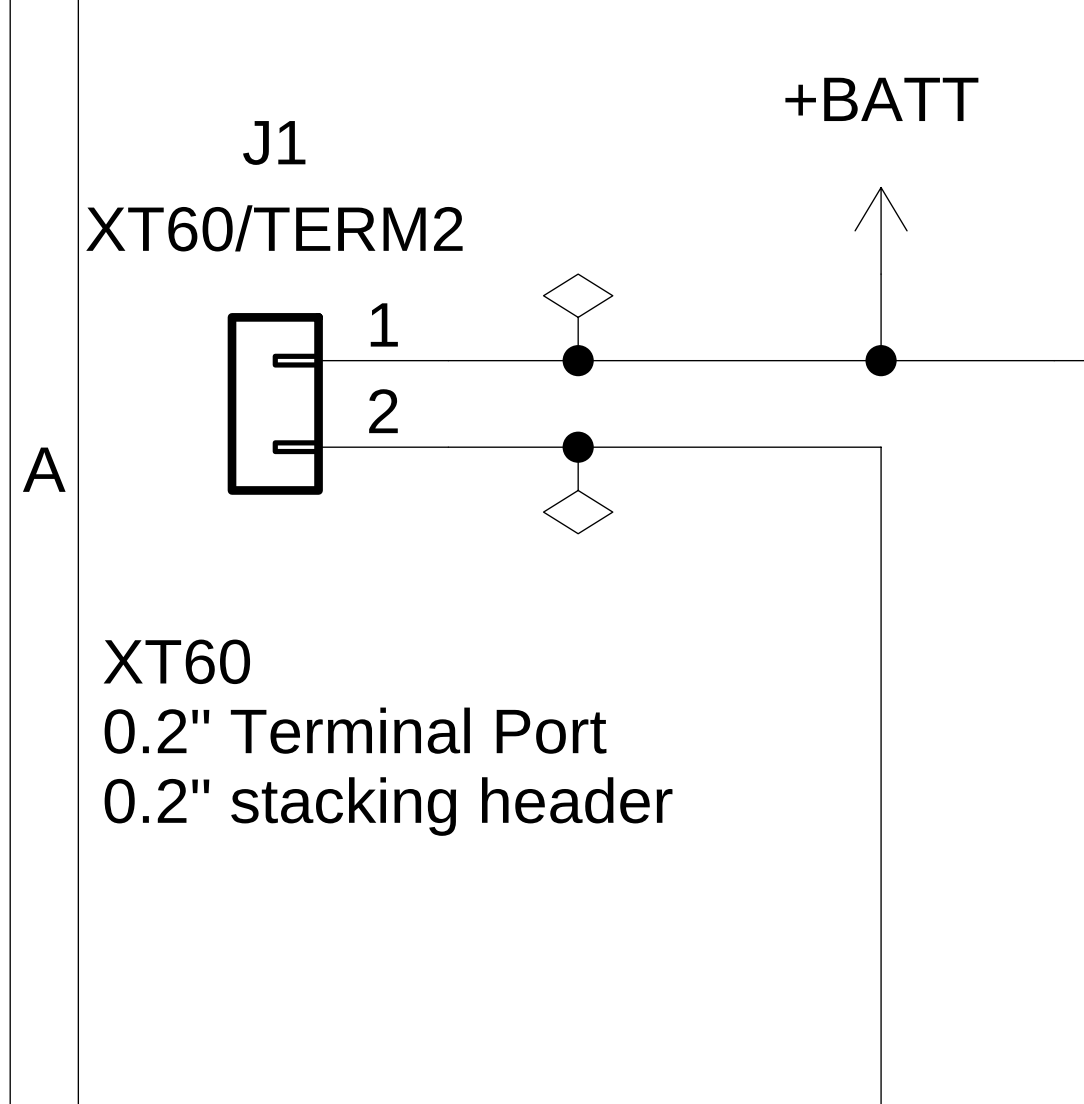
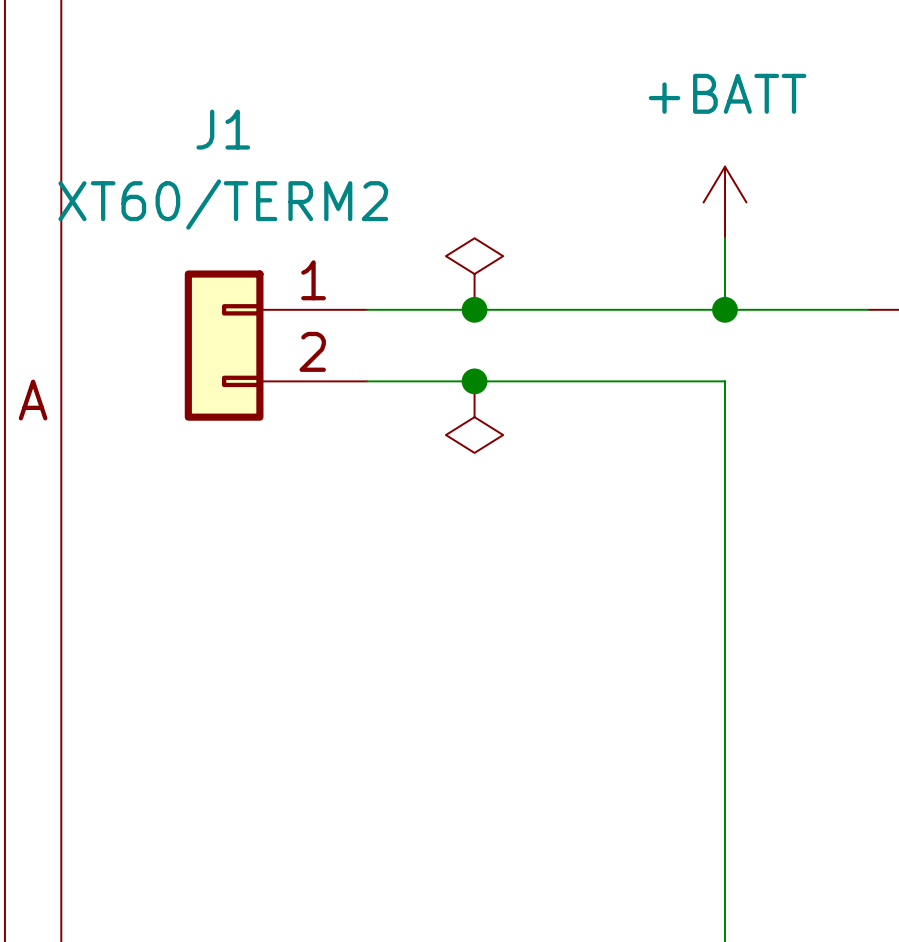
text: XT60 (176, 661) -> none
text: 0.2" Terminal Port (355, 730) -> none
text: 0.2" stacking header (388, 806) -> none

